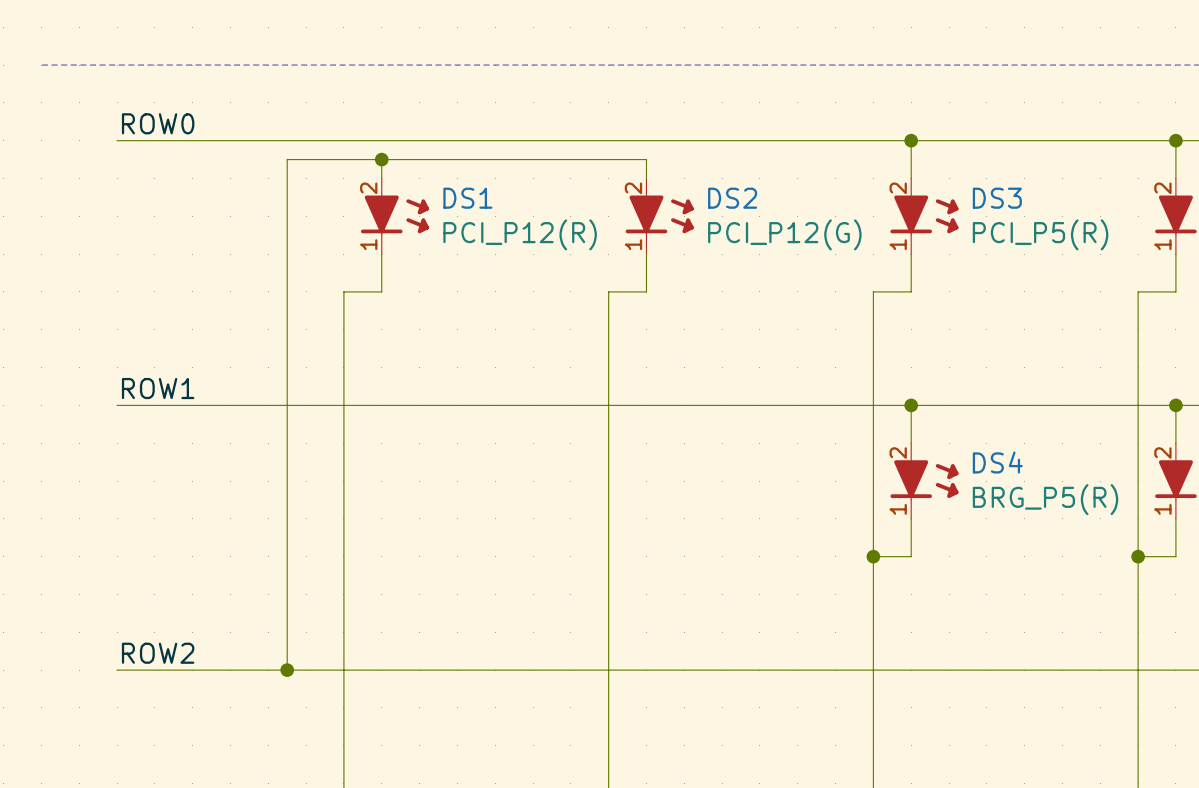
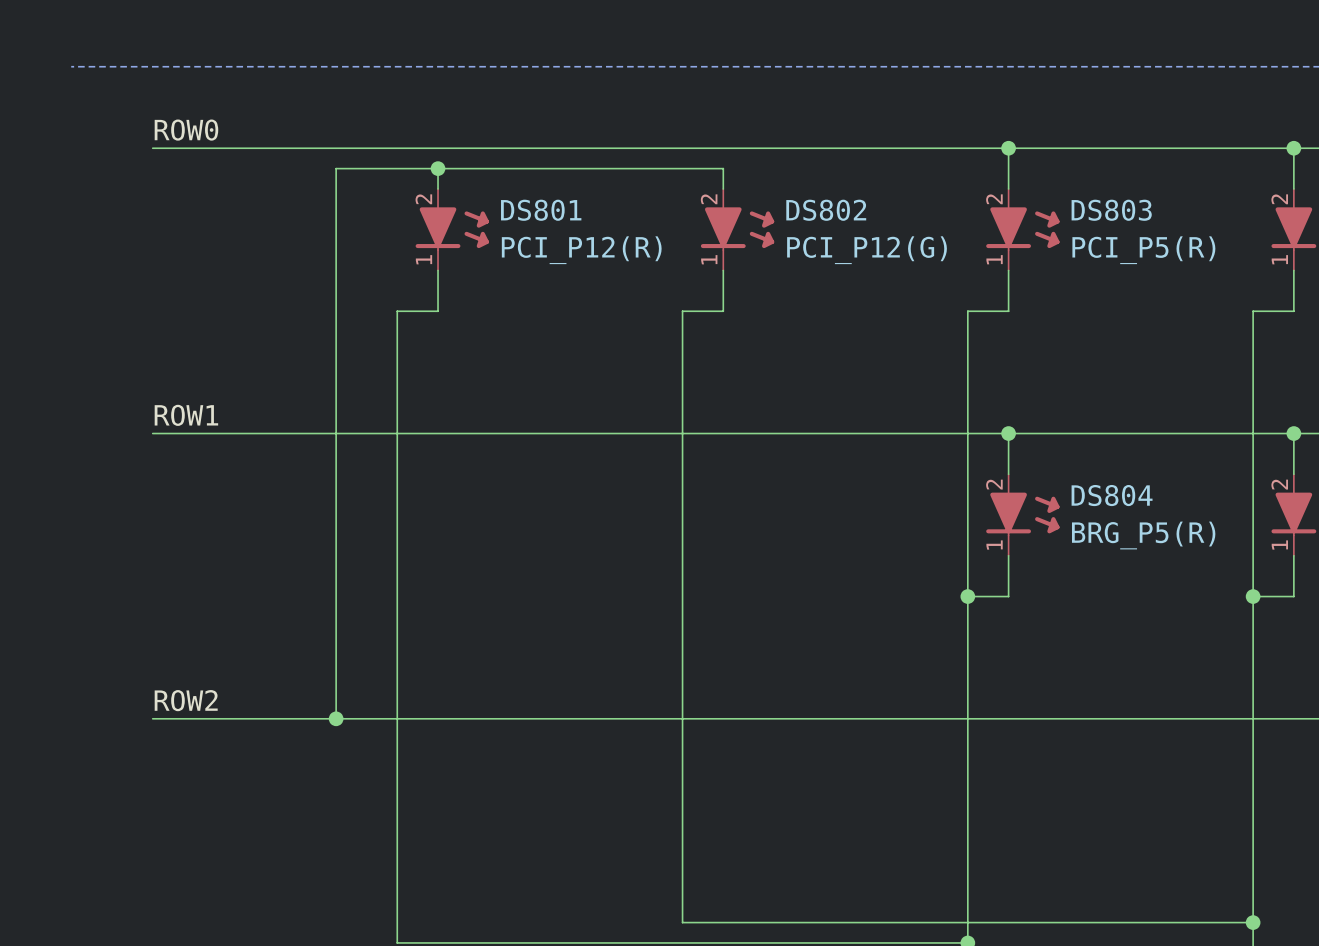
DS1 name: DS1 (467, 198) -> DS801 (541, 210)
DS2 name: DS2 (732, 198) -> DS802 (826, 210)
DS3 name: DS3 (997, 198) -> DS803 (1111, 210)
DS4 name: DS4 (997, 462) -> DS804 (1112, 495)

